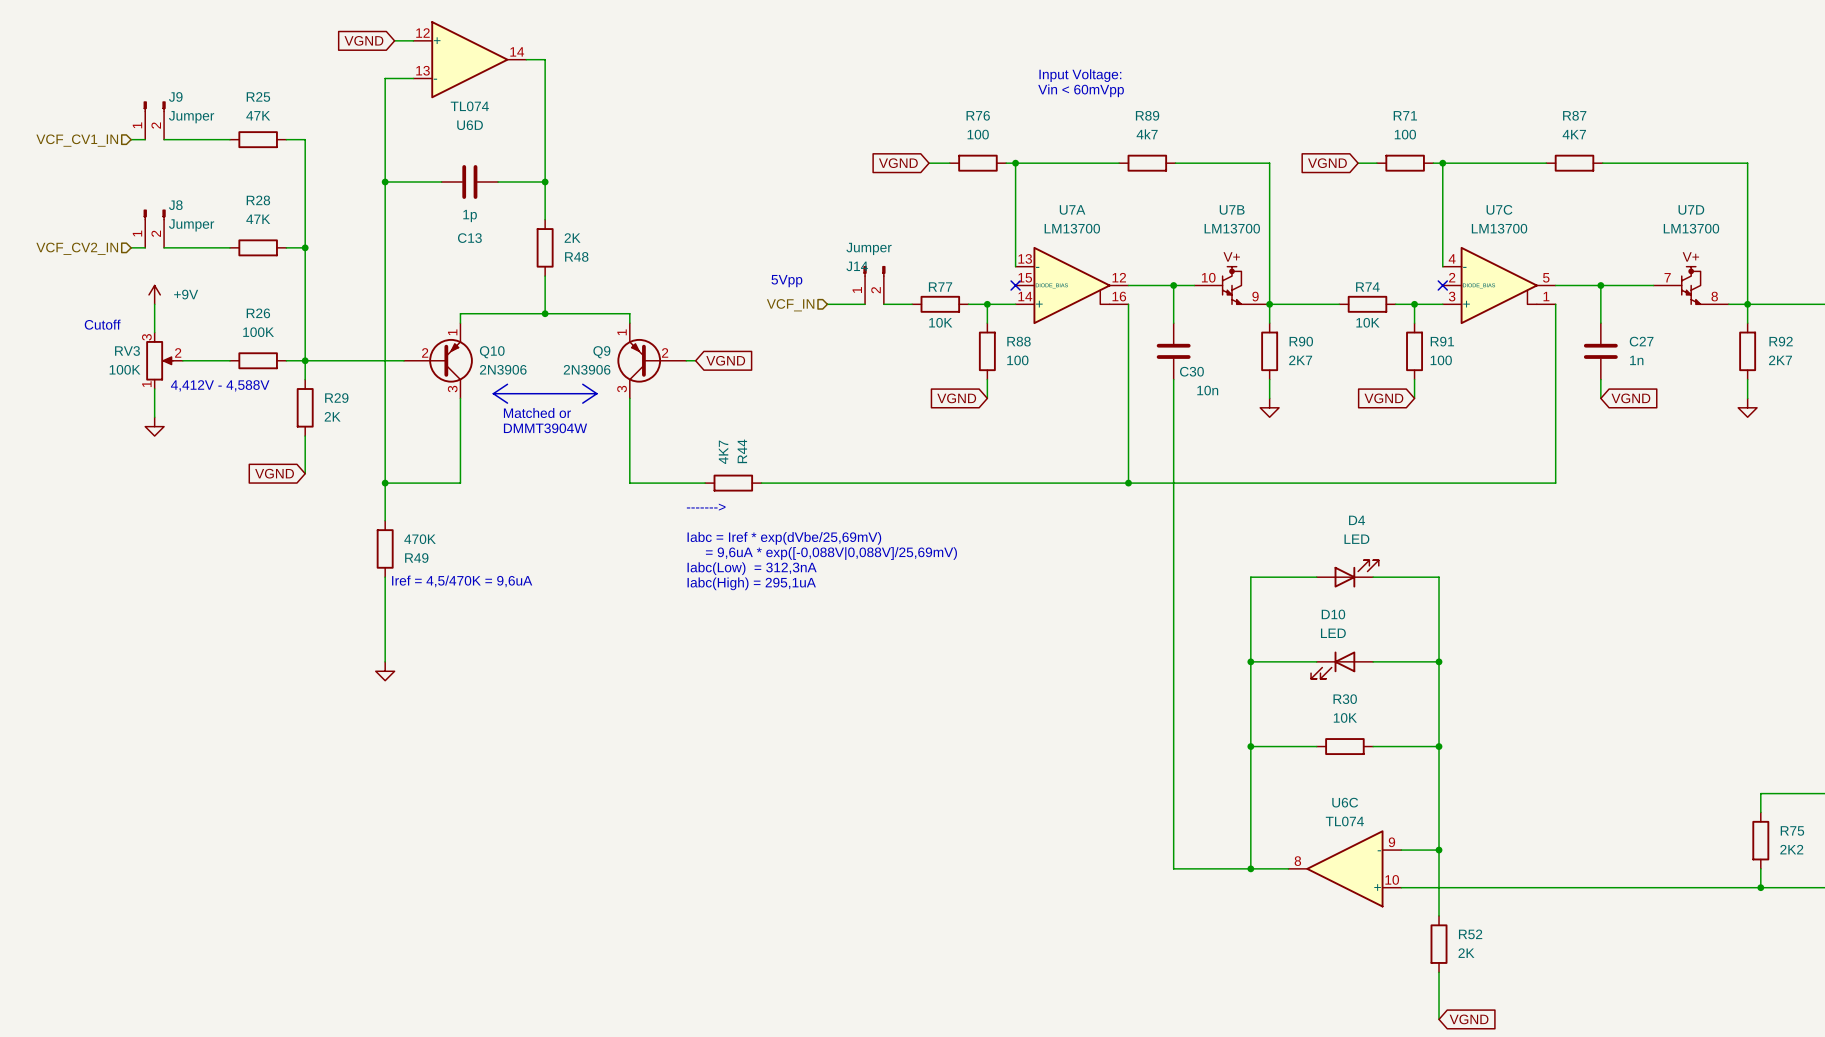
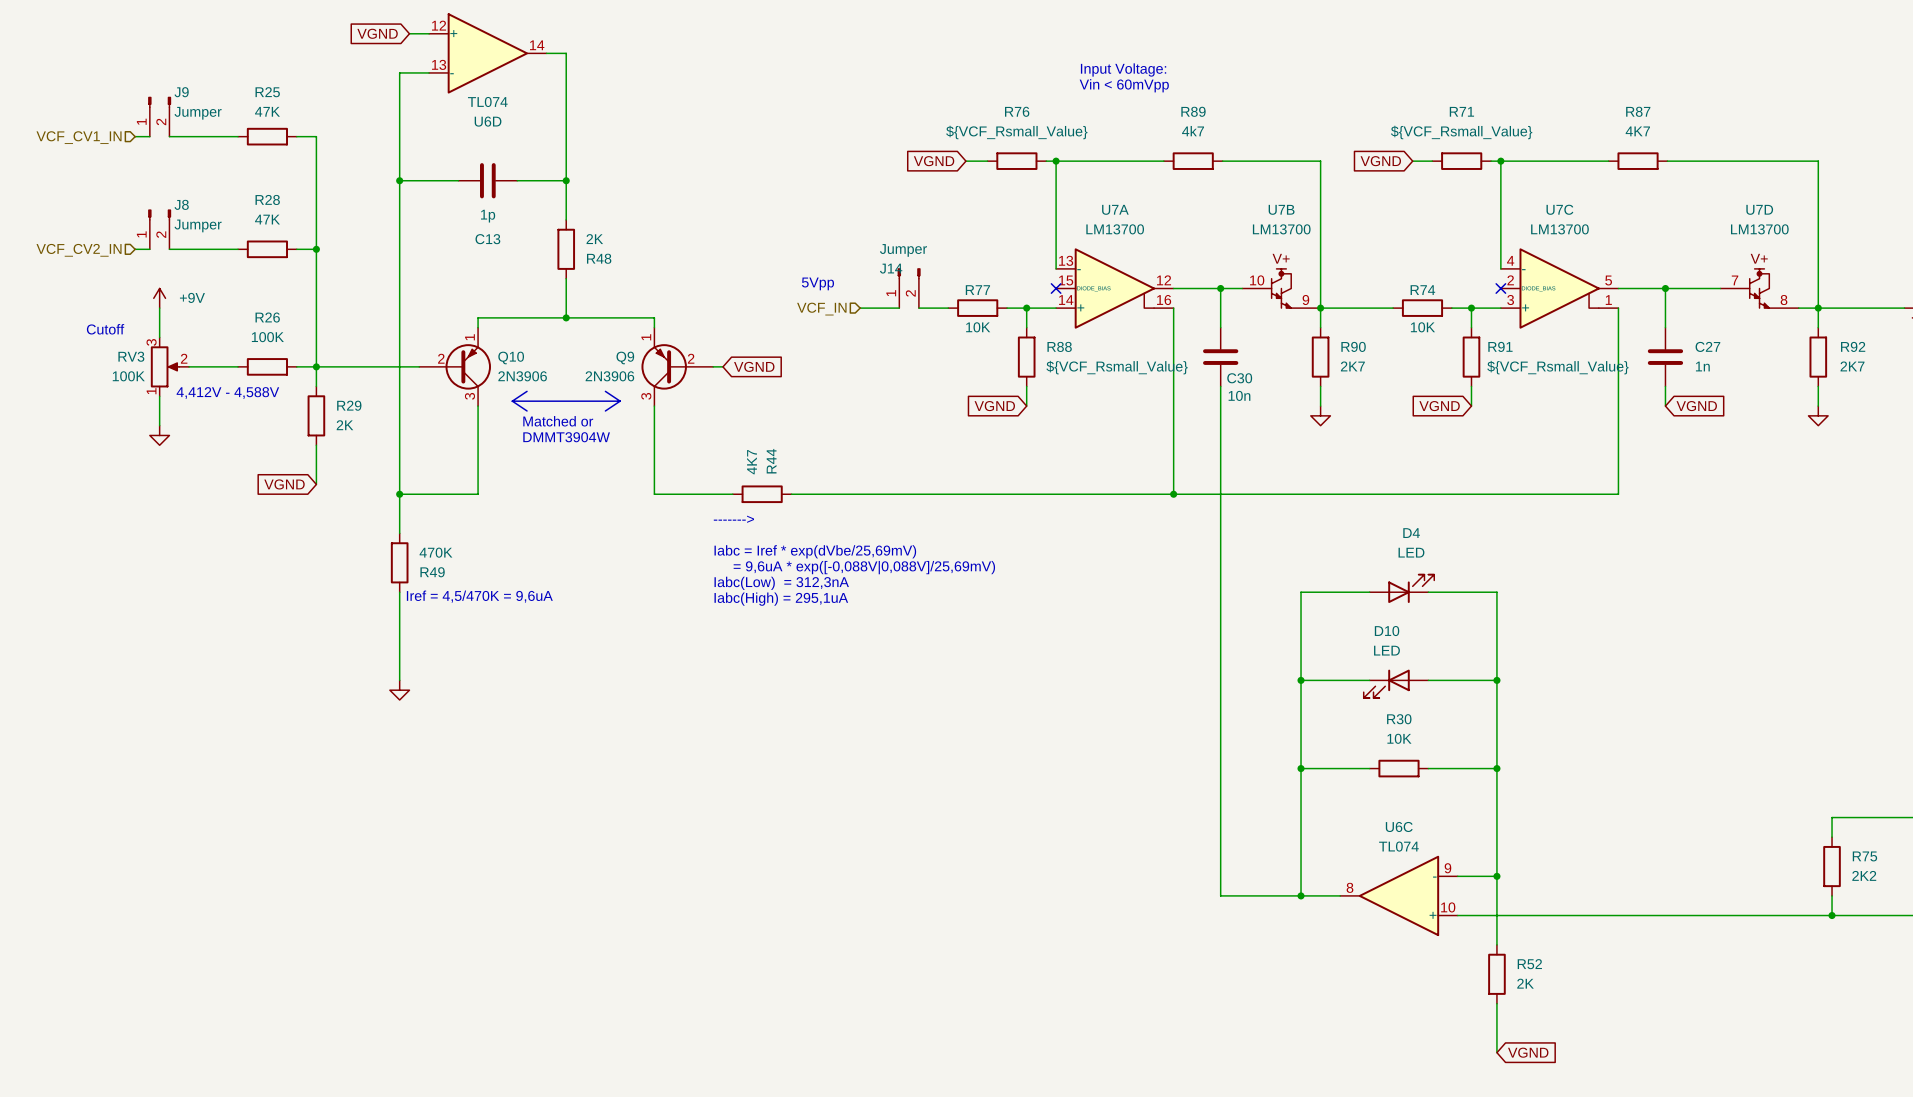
R76 value: 100 (978, 134) -> ${VCF_Rsmall_Value} (1016, 132)
R71 value: 100 (1405, 134) -> ${VCF_Rsmall_Value} (1461, 132)
R88 value: 100 (1017, 360) -> ${VCF_Rsmall_Value} (1117, 367)
R91 value: 100 (1441, 360) -> ${VCF_Rsmall_Value} (1557, 367)
C30 value position: 10n (1207, 390) -> 10n (1239, 395)

